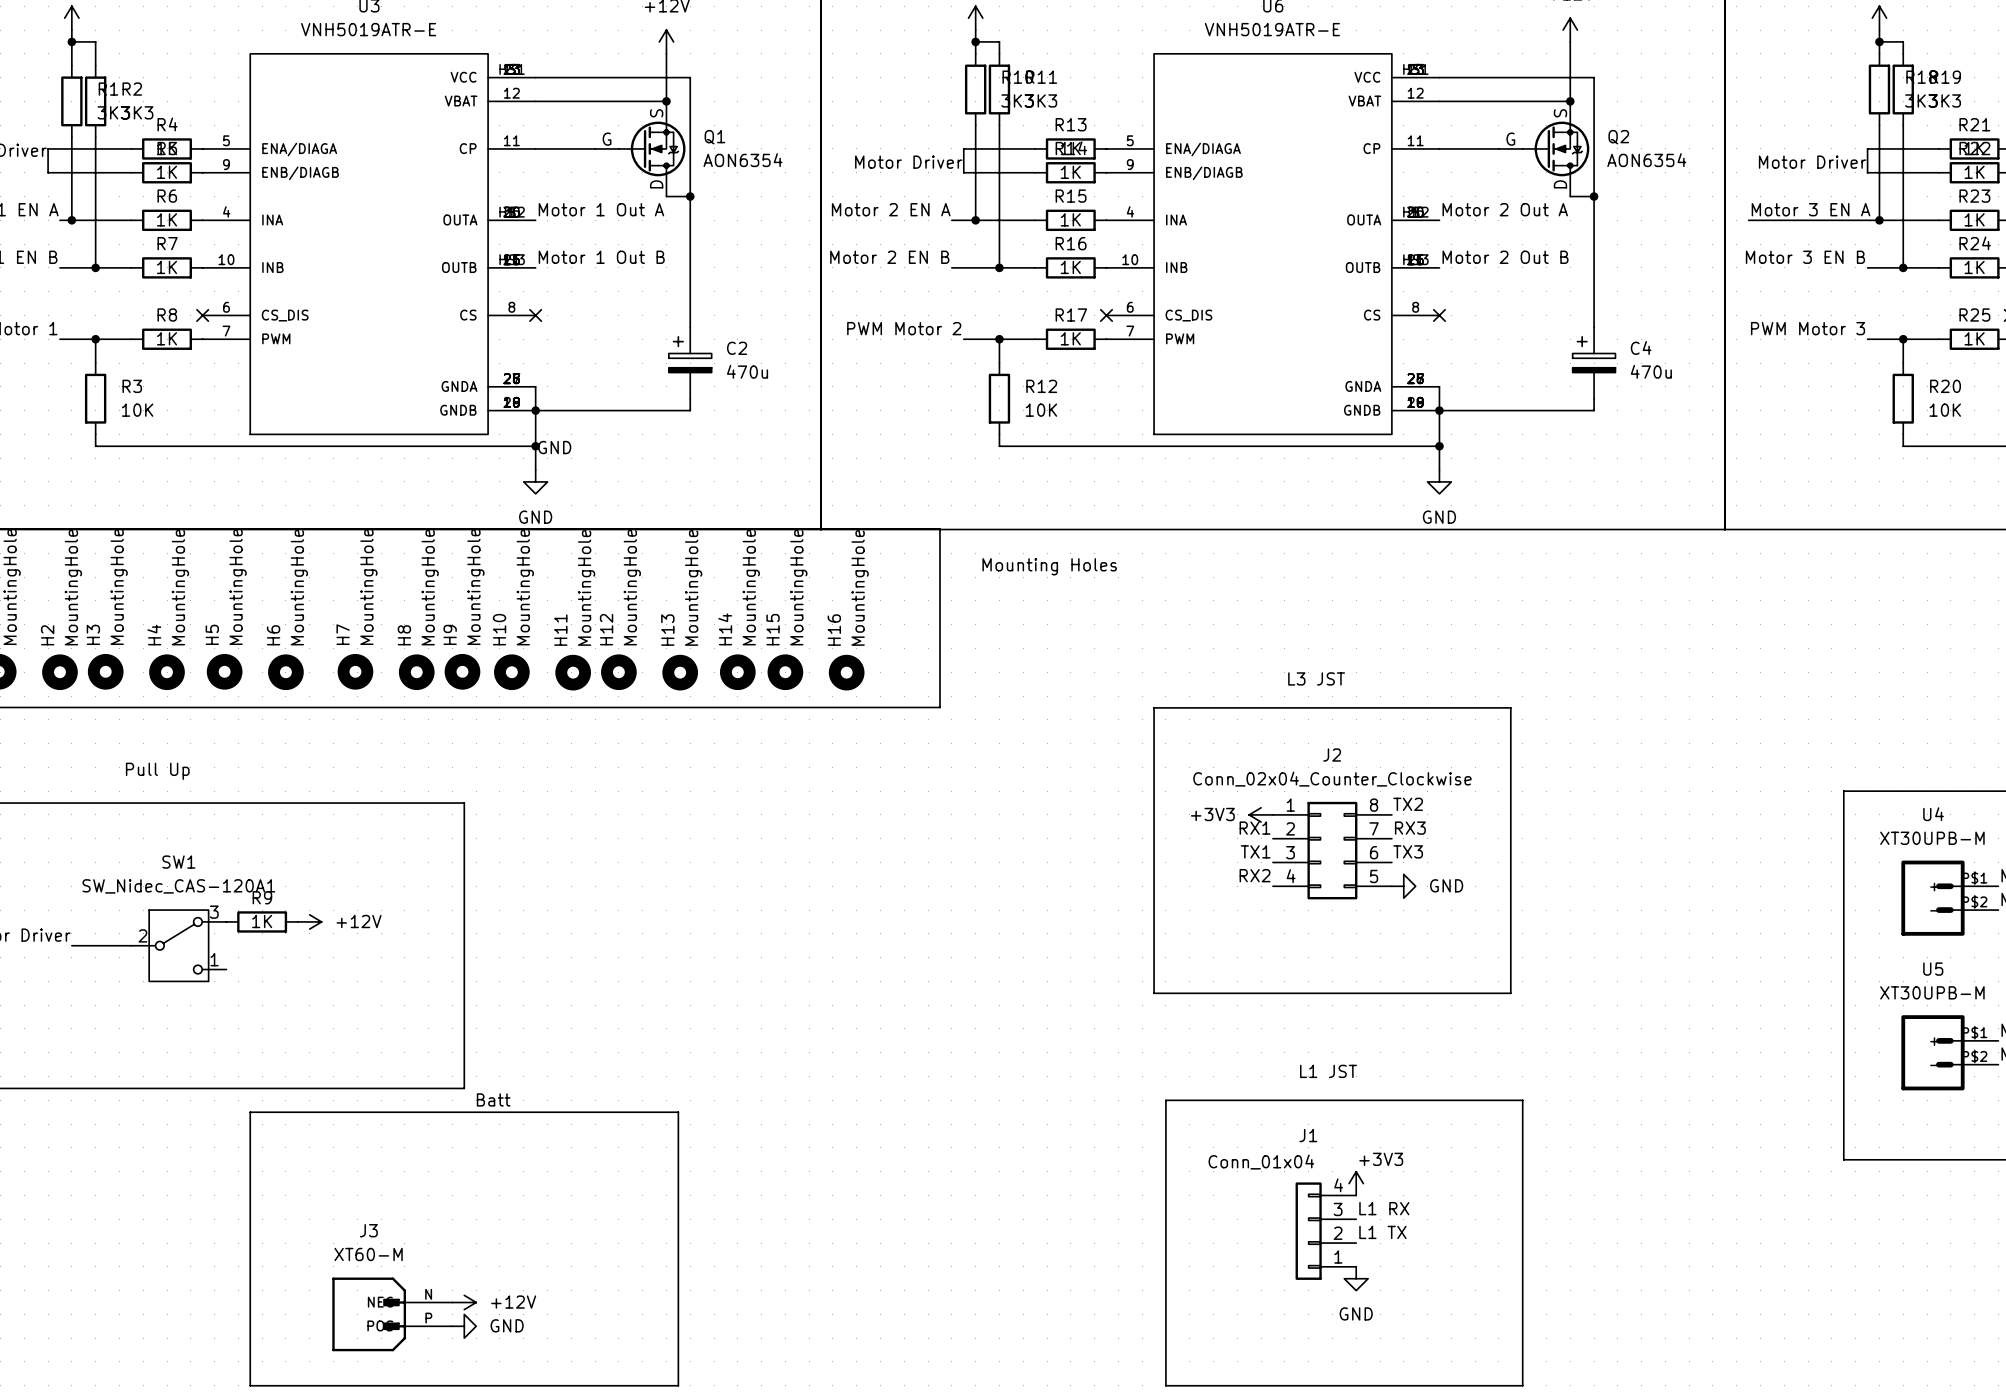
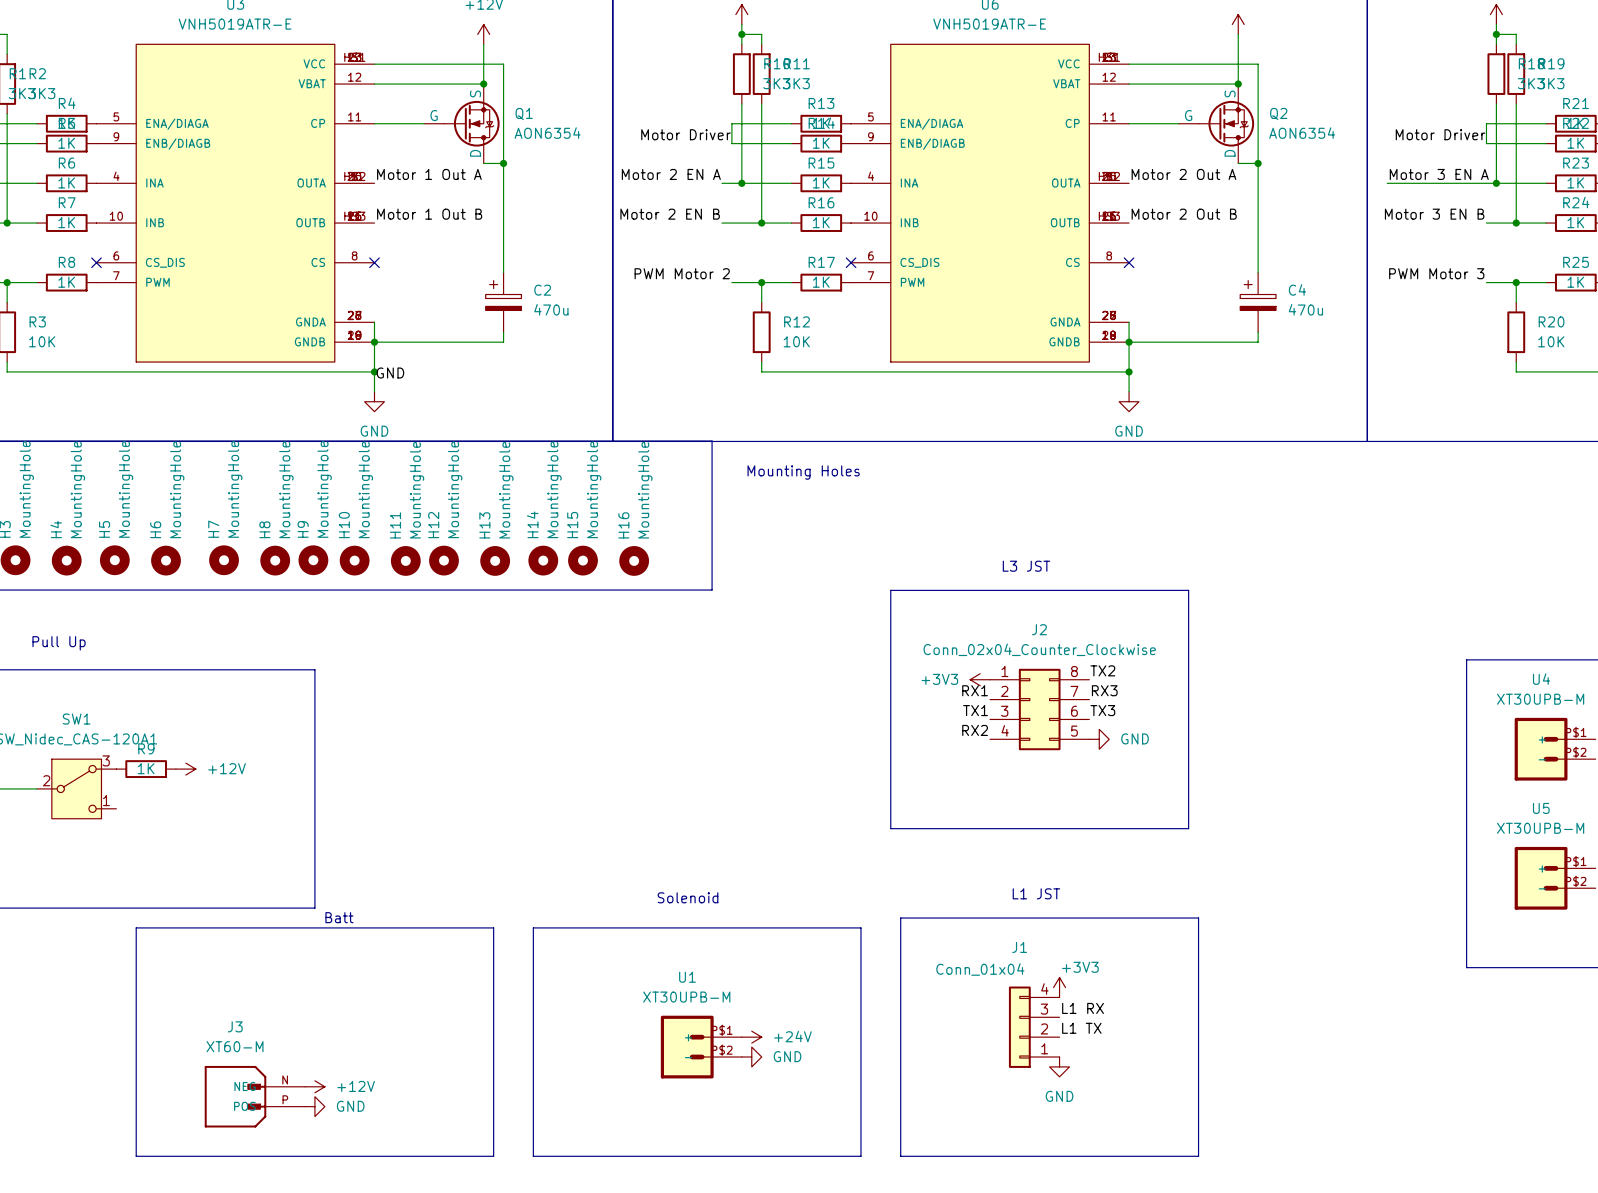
text: none -> Solenoid (687, 897)
line: none -> (533, 927) (860, 927) (860, 1156) (533, 1156) (533, 927)
power symbol: none -> +24V (751, 1037)
U1: none -> XT30UPB-M (701, 1047)
power symbol: none -> GND (751, 1057)

